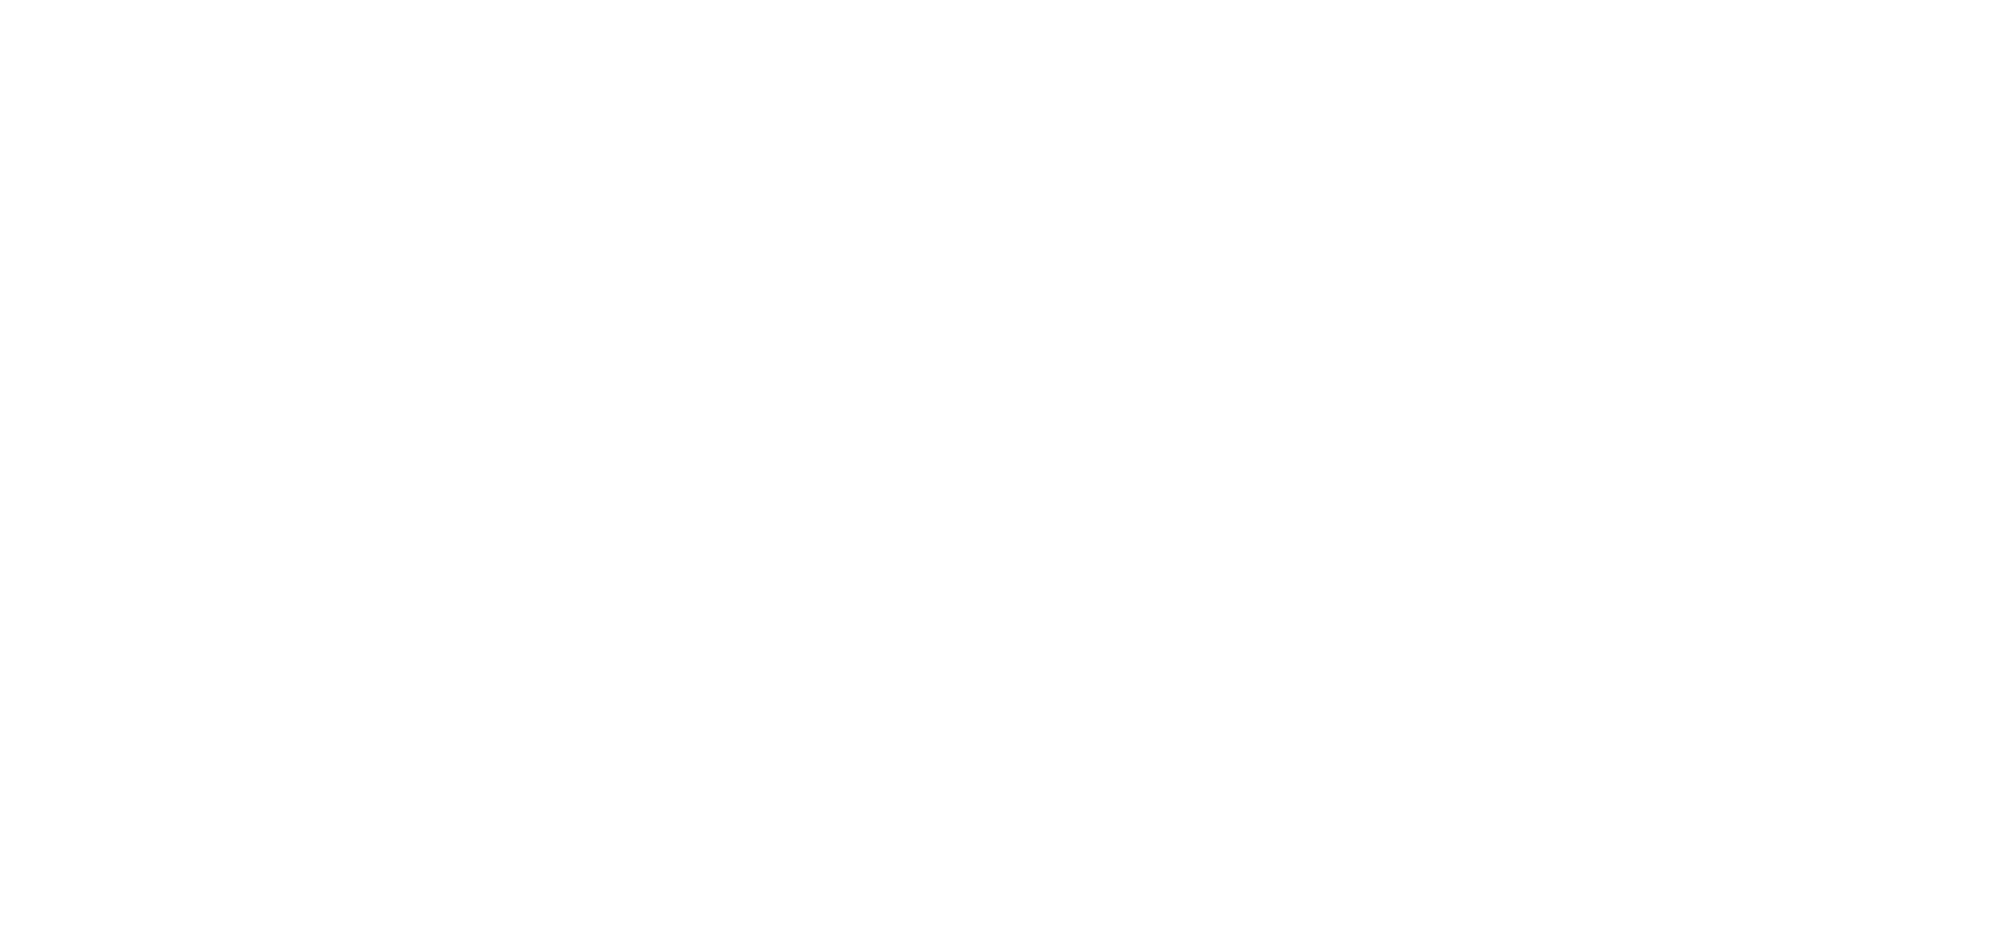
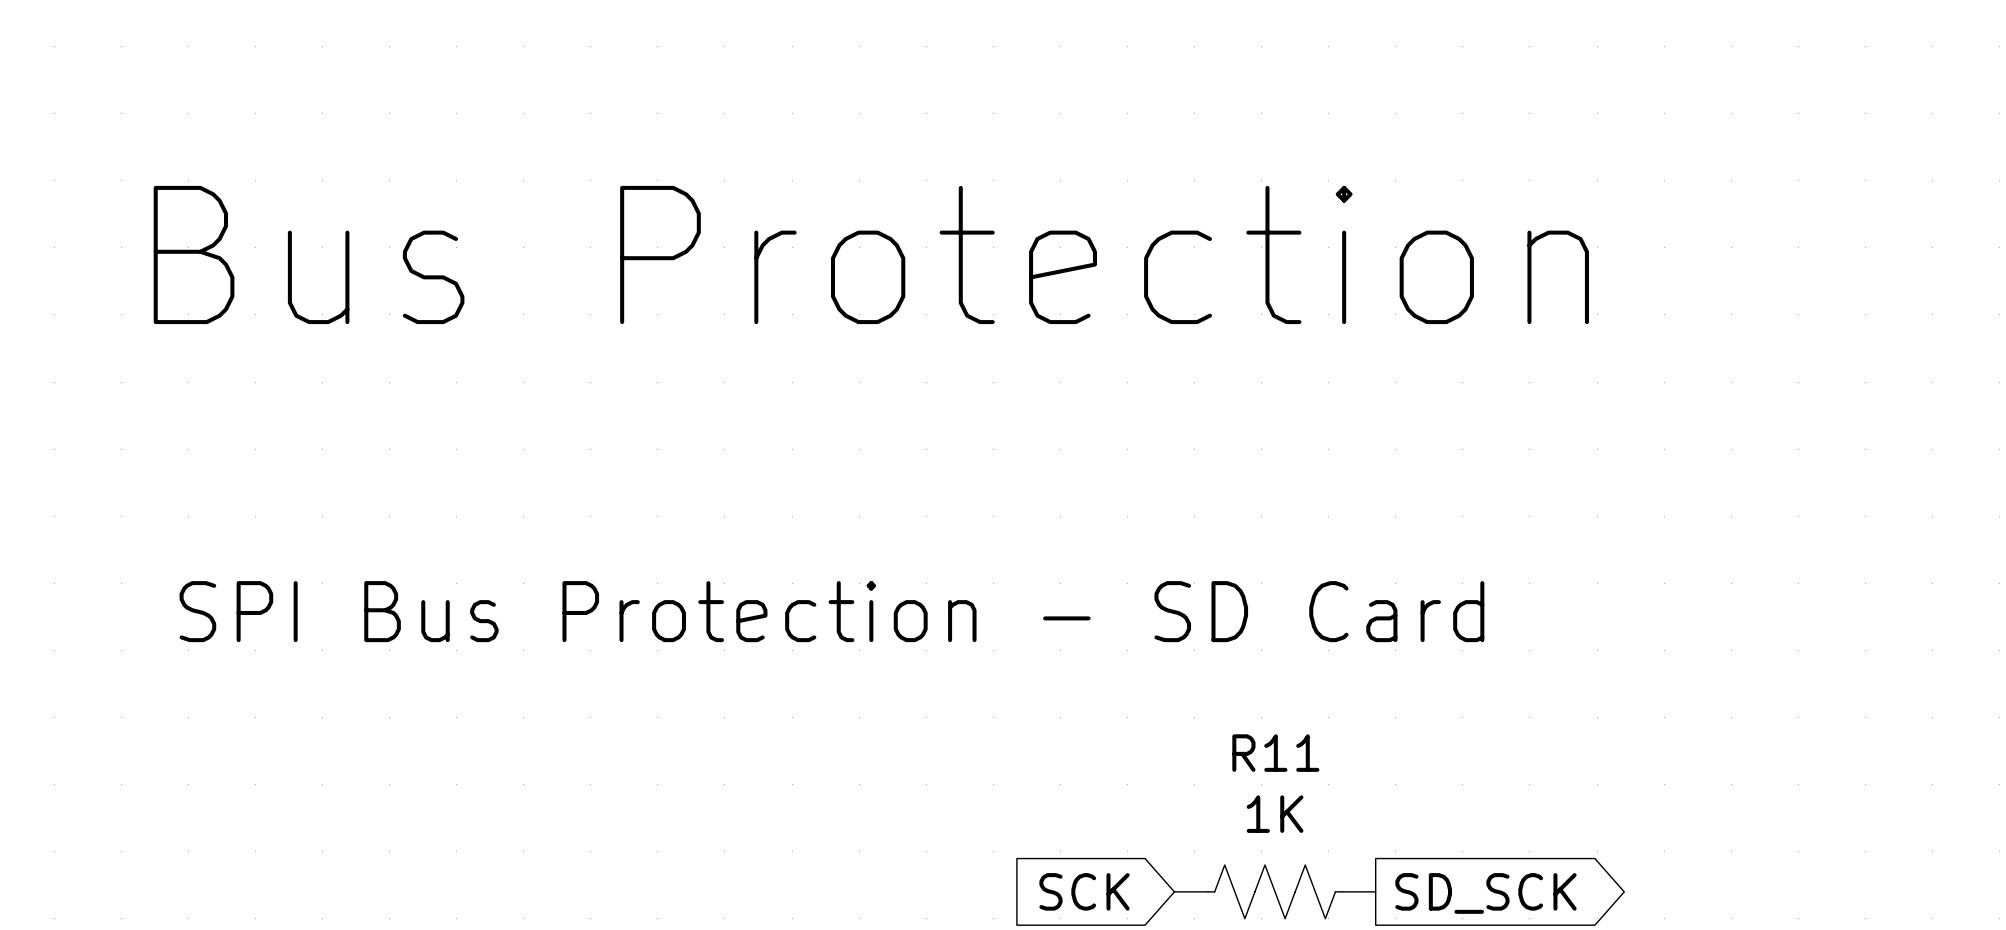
text: none -> Bus Protection (871, 254)
text: none -> SPI Bus Protection - SD Card (831, 611)
R11: none -> 1K (1275, 891)
global label: none -> SCK (1084, 891)
global label: none -> SD_SCK (1485, 893)

